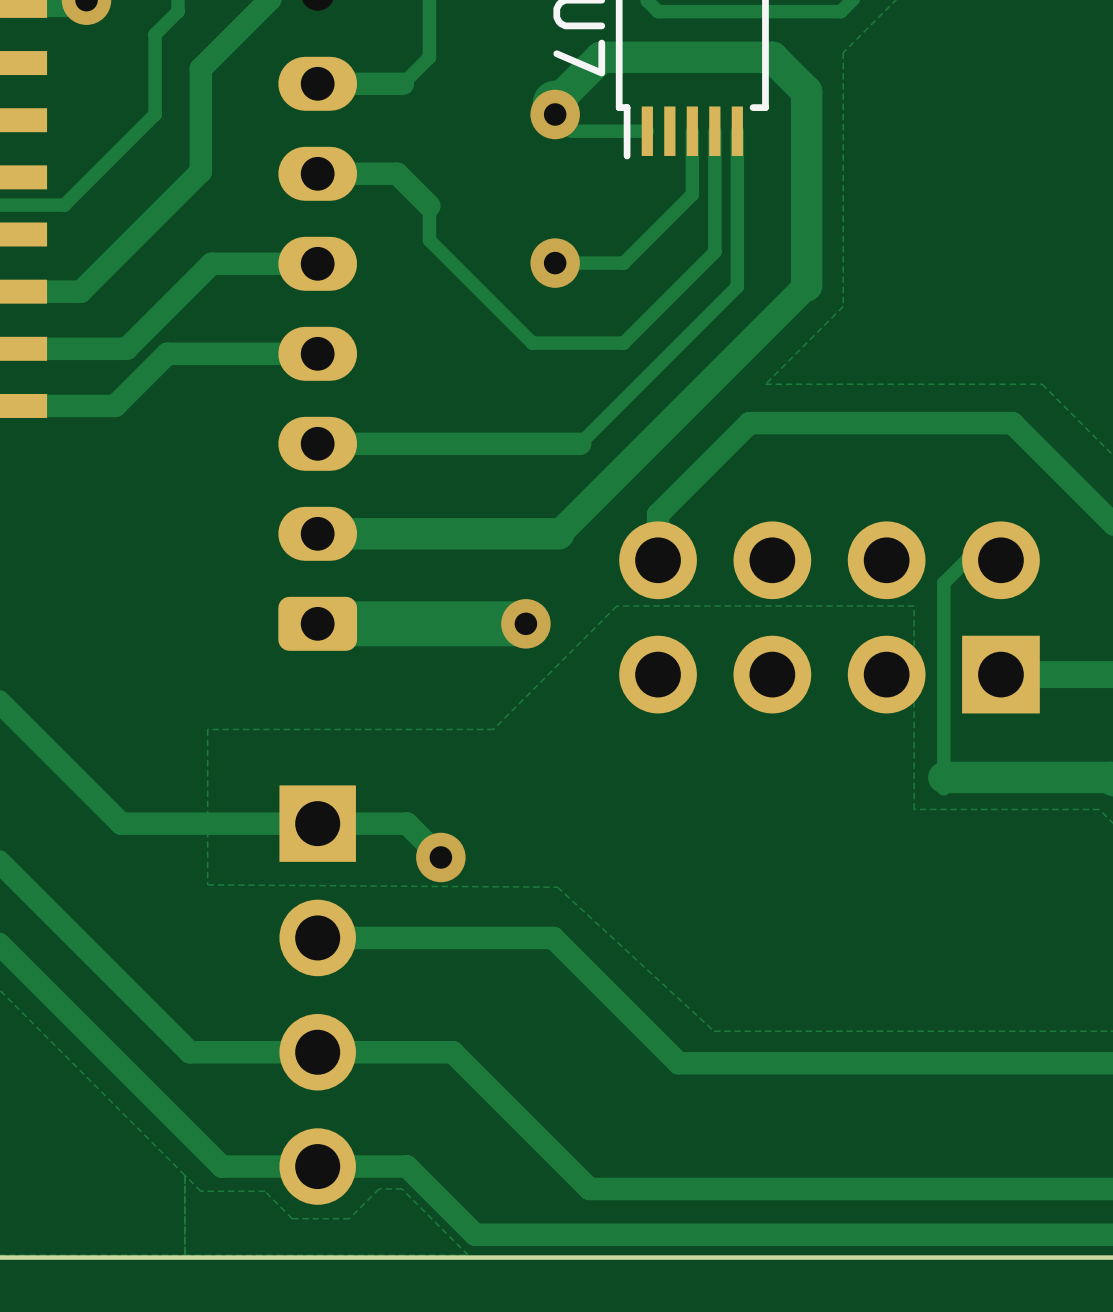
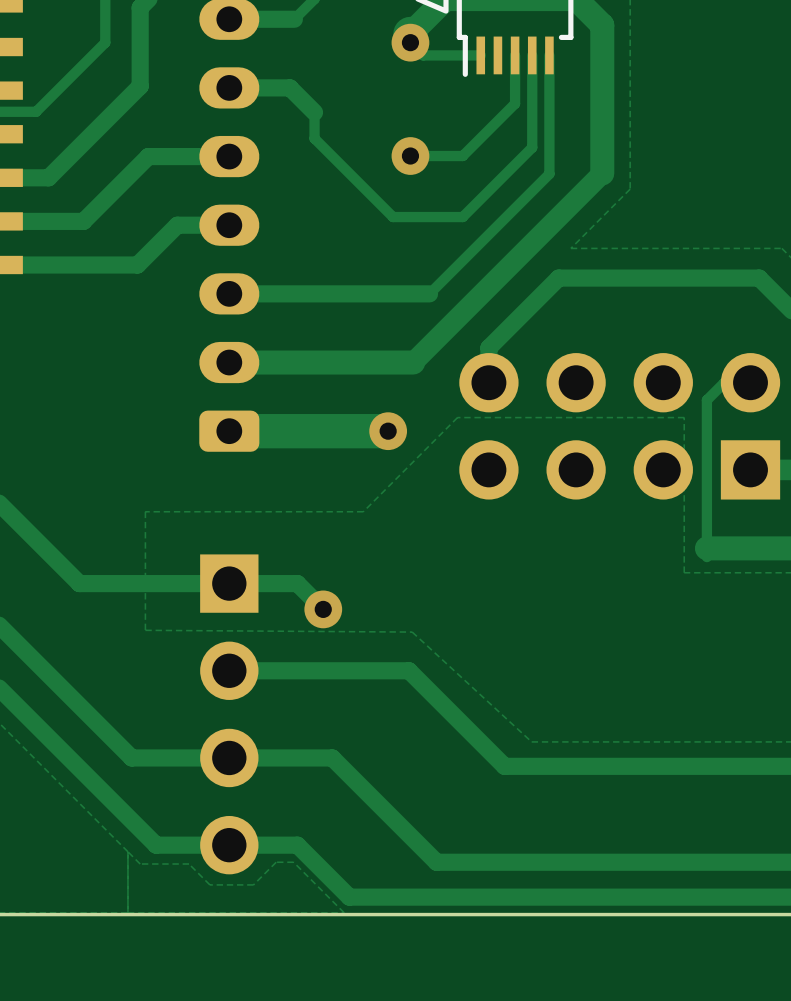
track: (249, 353) (167, 353) (115, 405) -> (177, 225) (137, 265) (74, 265)

